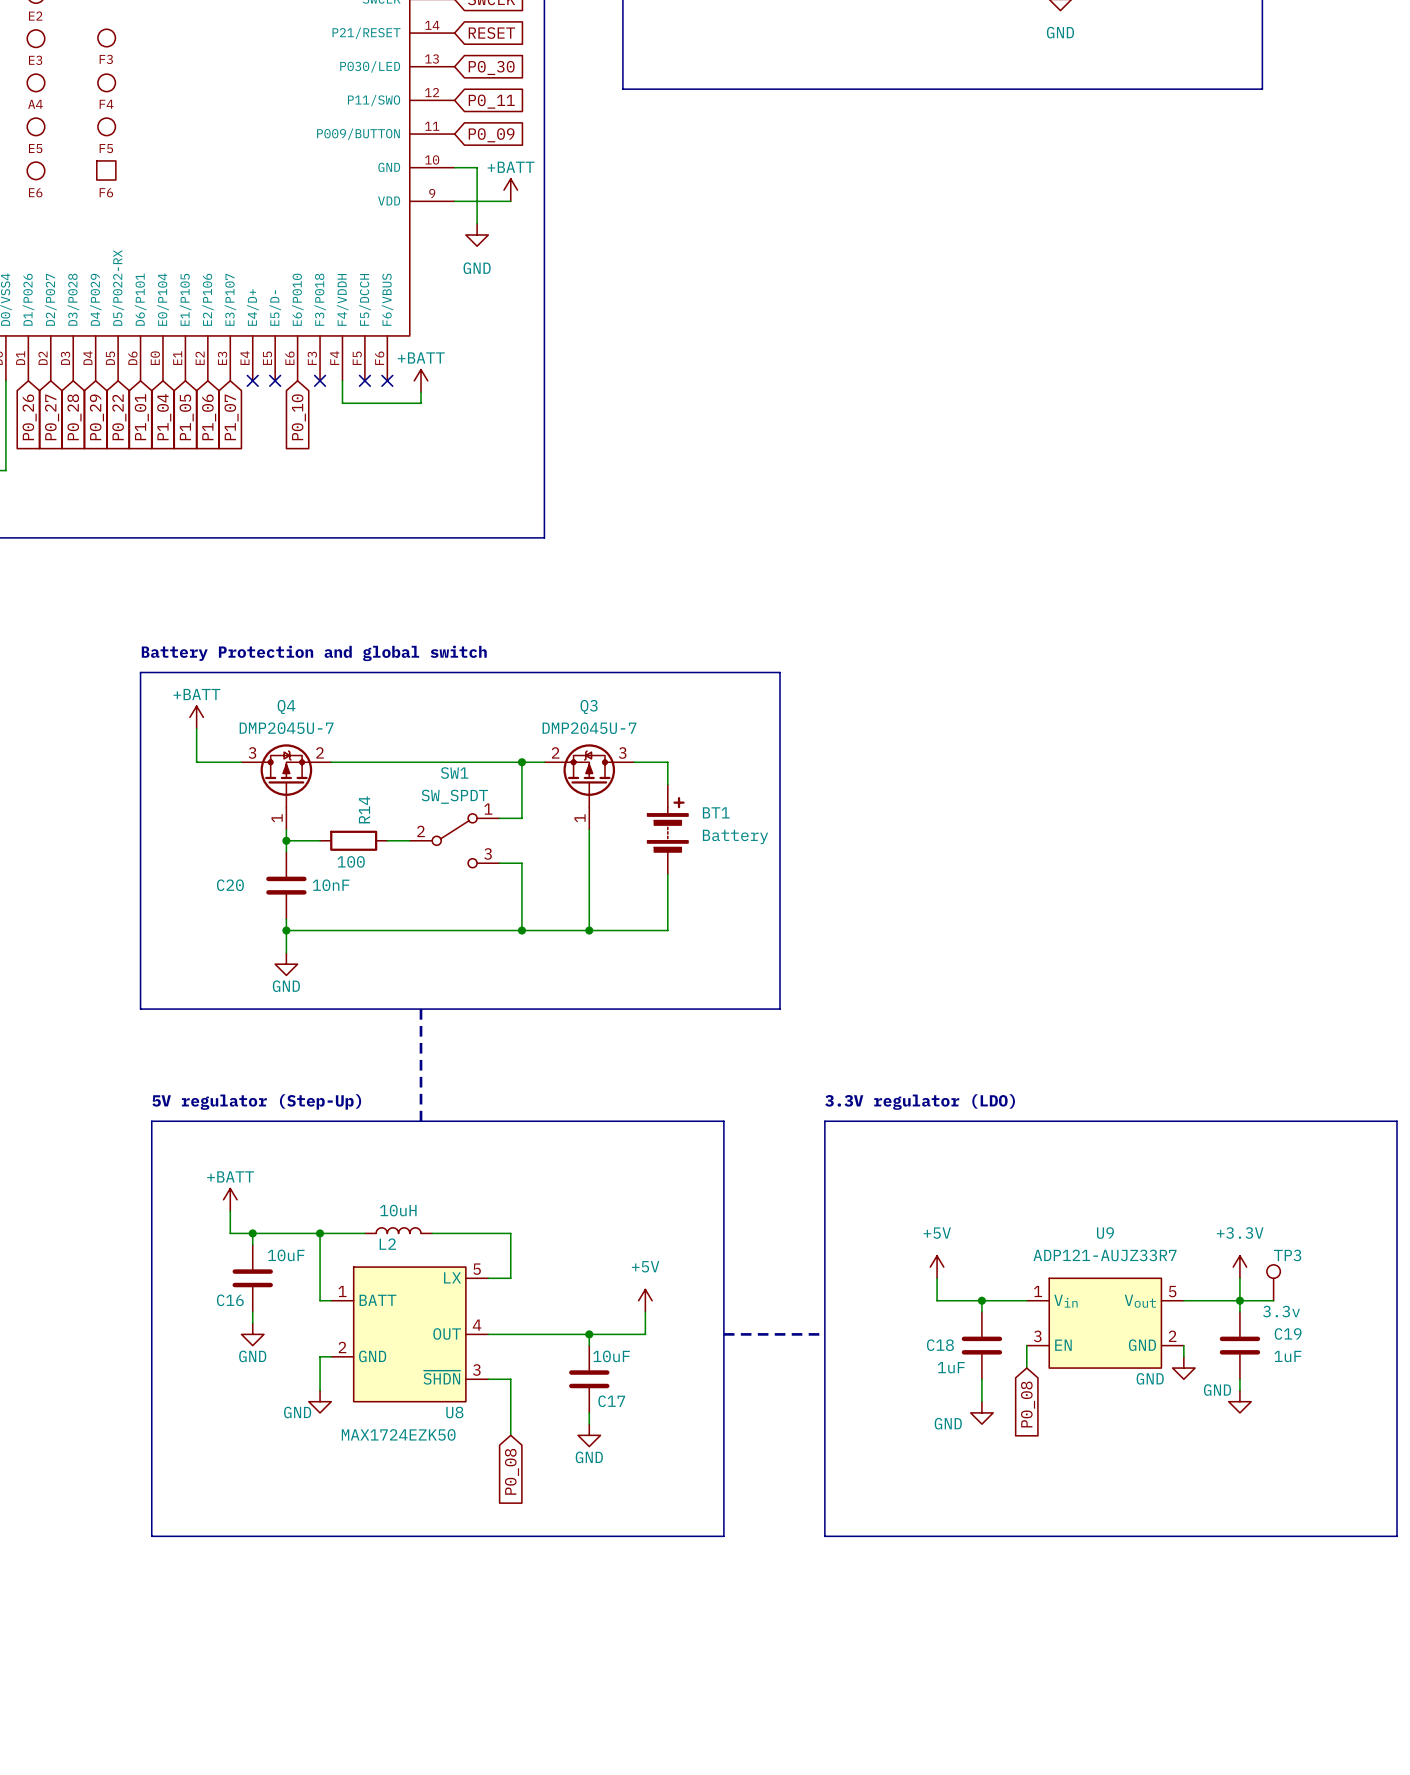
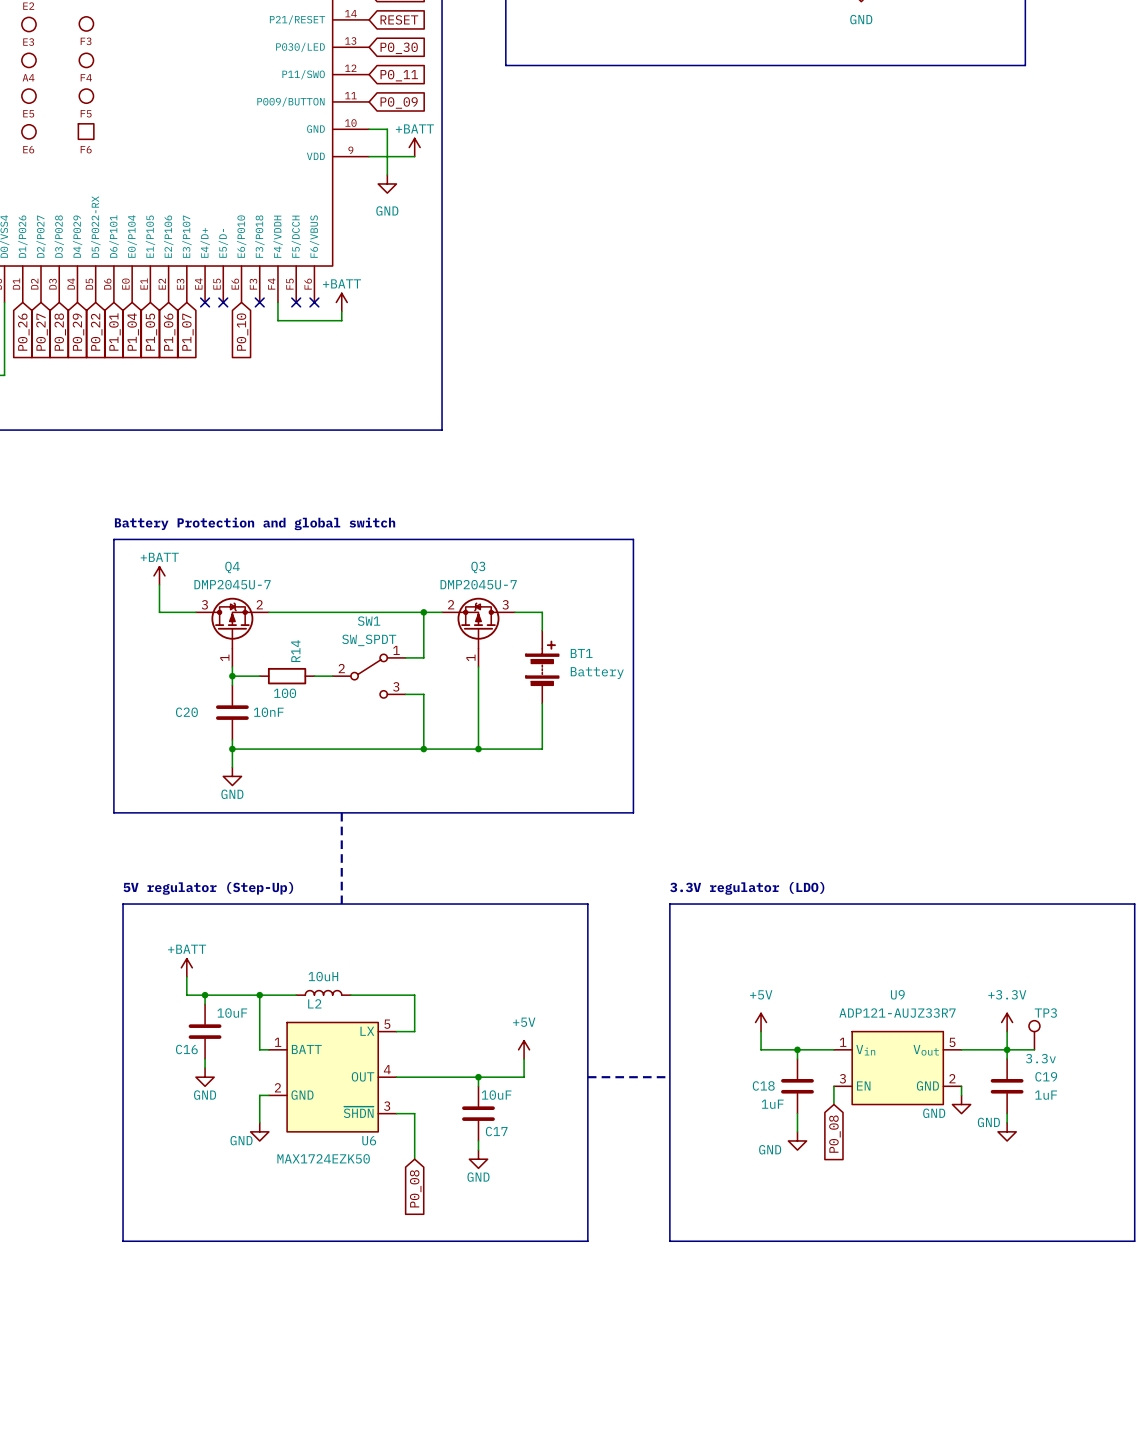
U8 name: U8 (454, 1412) -> U6 (369, 1140)

